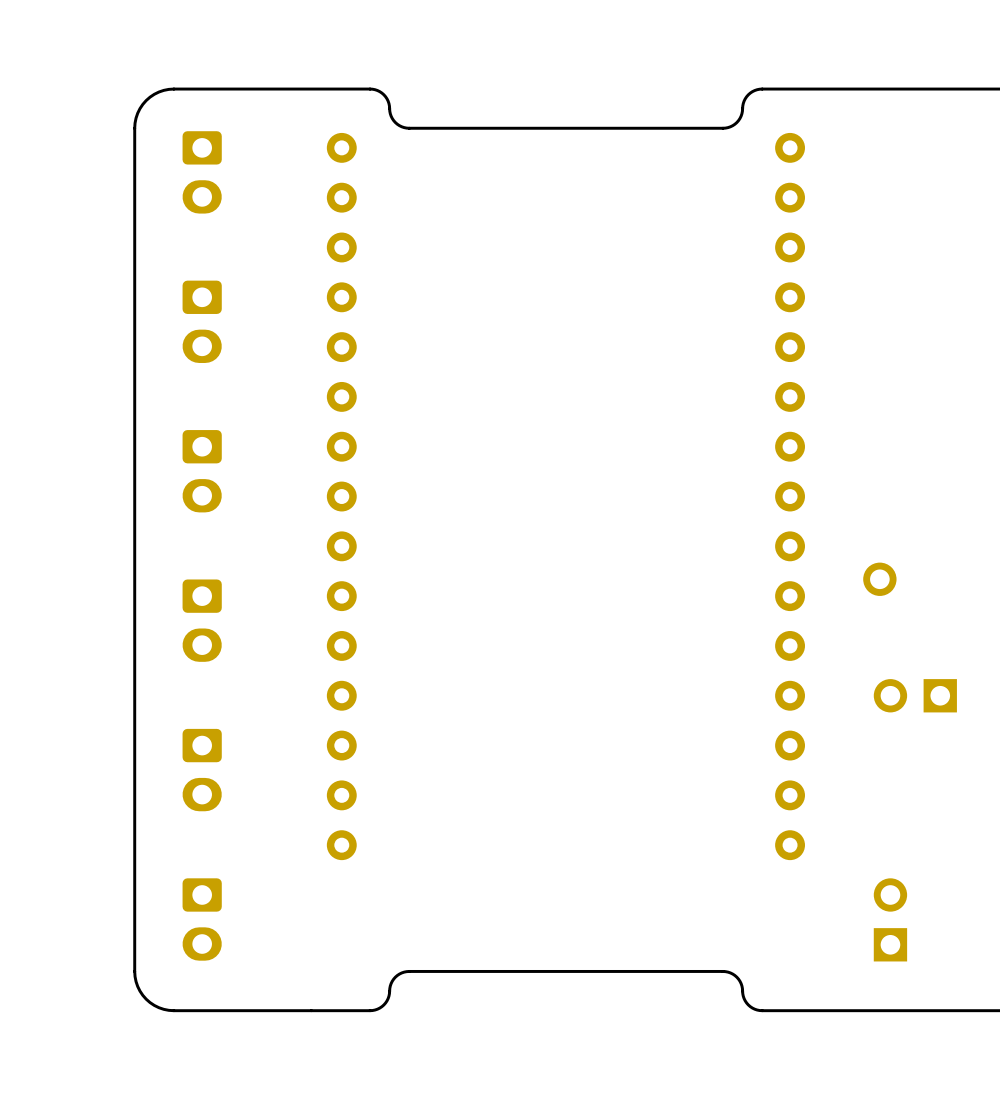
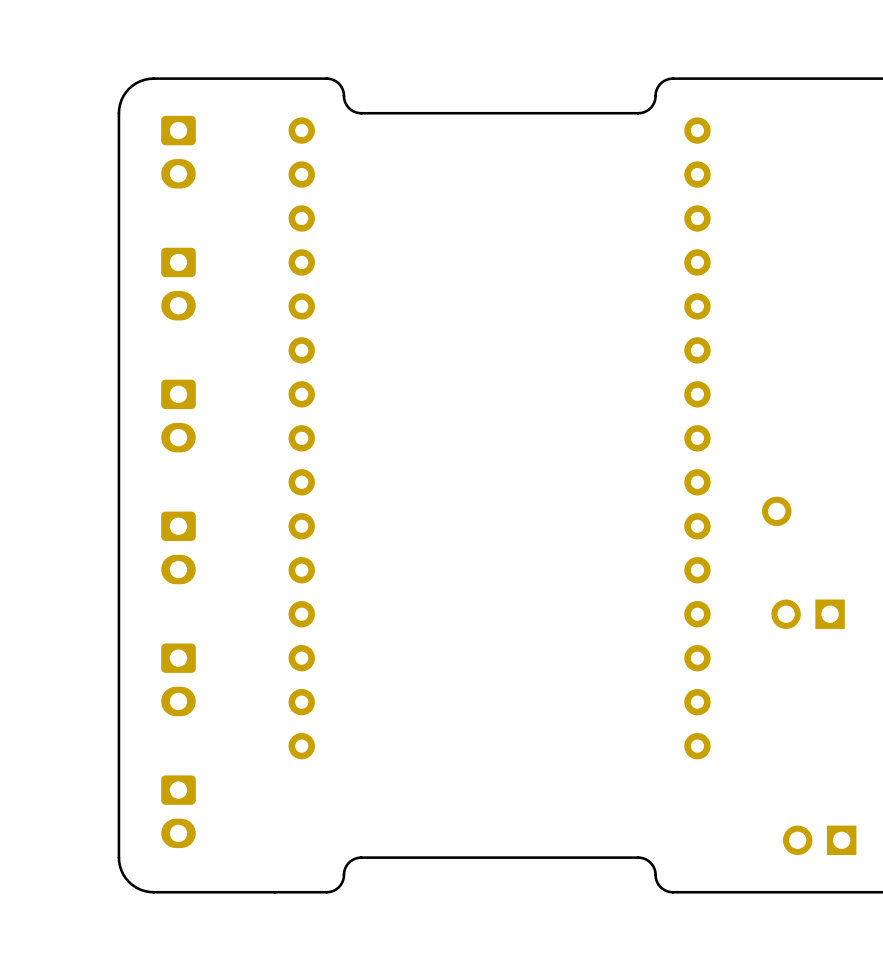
part rotation: 0° (890, 919) -> 90° counterclockwise (819, 840)

